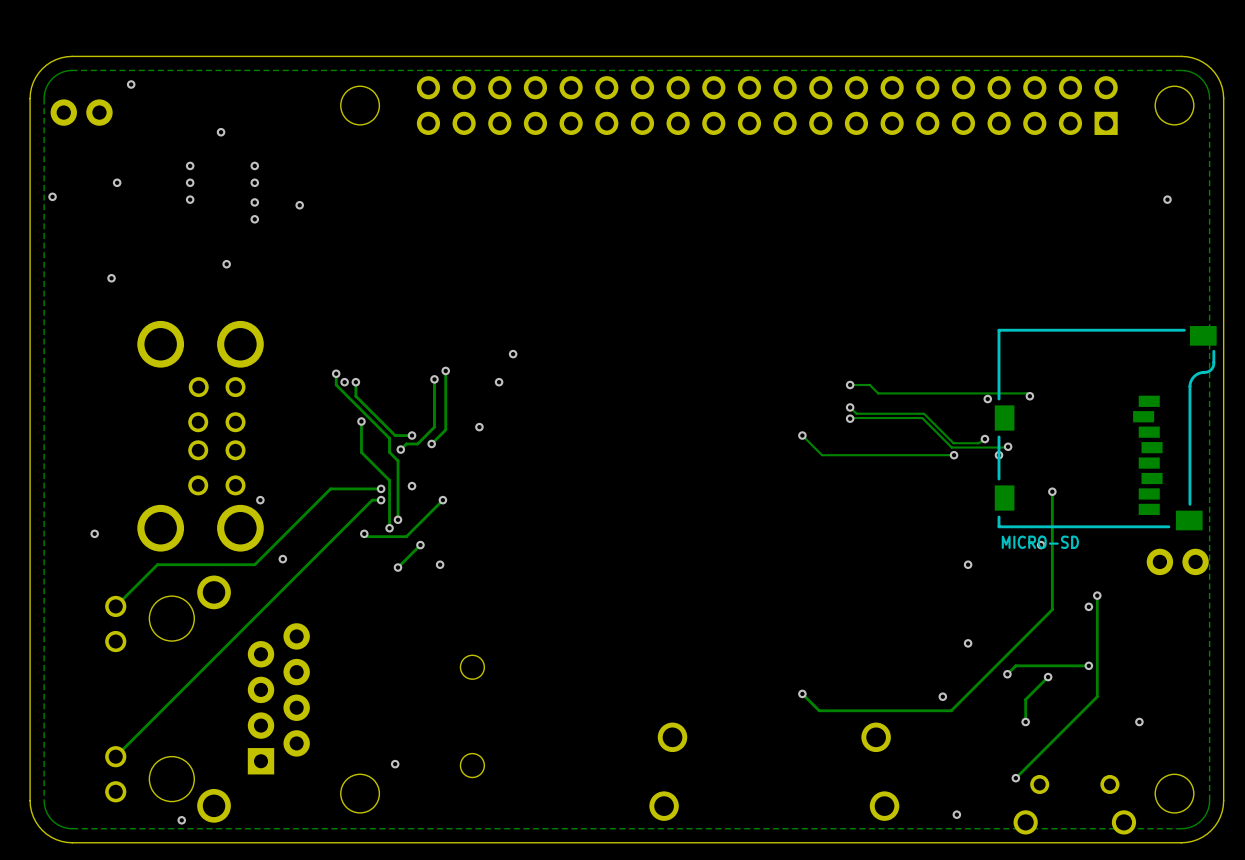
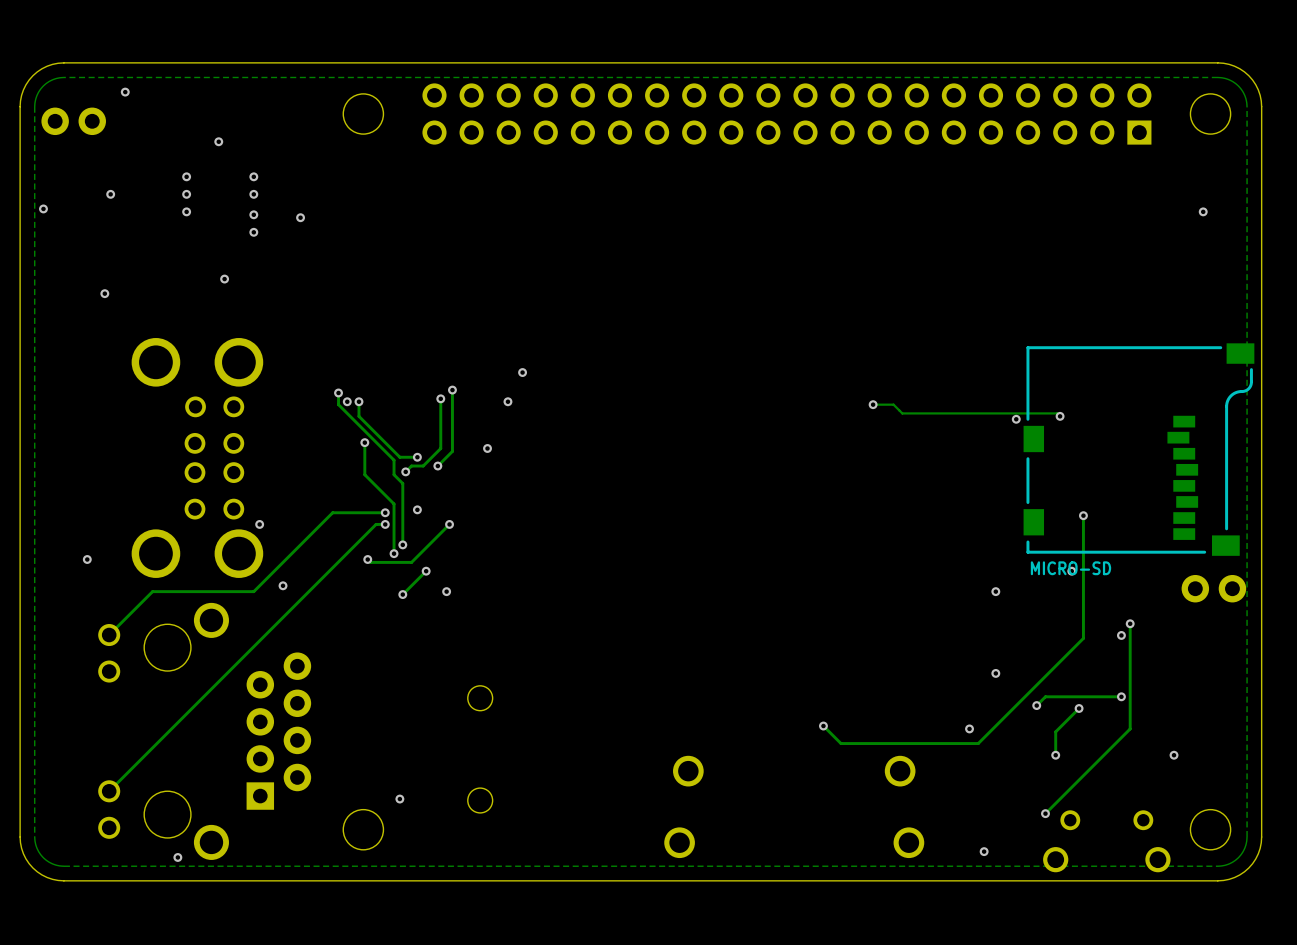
track: (850, 407) (856, 413) (924, 413) (953, 443) (978, 443) (984, 439) -> none
via: (850, 407) -> none
track: (850, 418) (922, 418) (951, 447) (1008, 446) -> none
via: (850, 418) -> none
track: (802, 435) (822, 455) (954, 455) -> none
via: (802, 435) -> none
via: (984, 439) -> none
via: (1008, 446) -> none
via: (954, 455) -> none
via: (998, 455) -> none

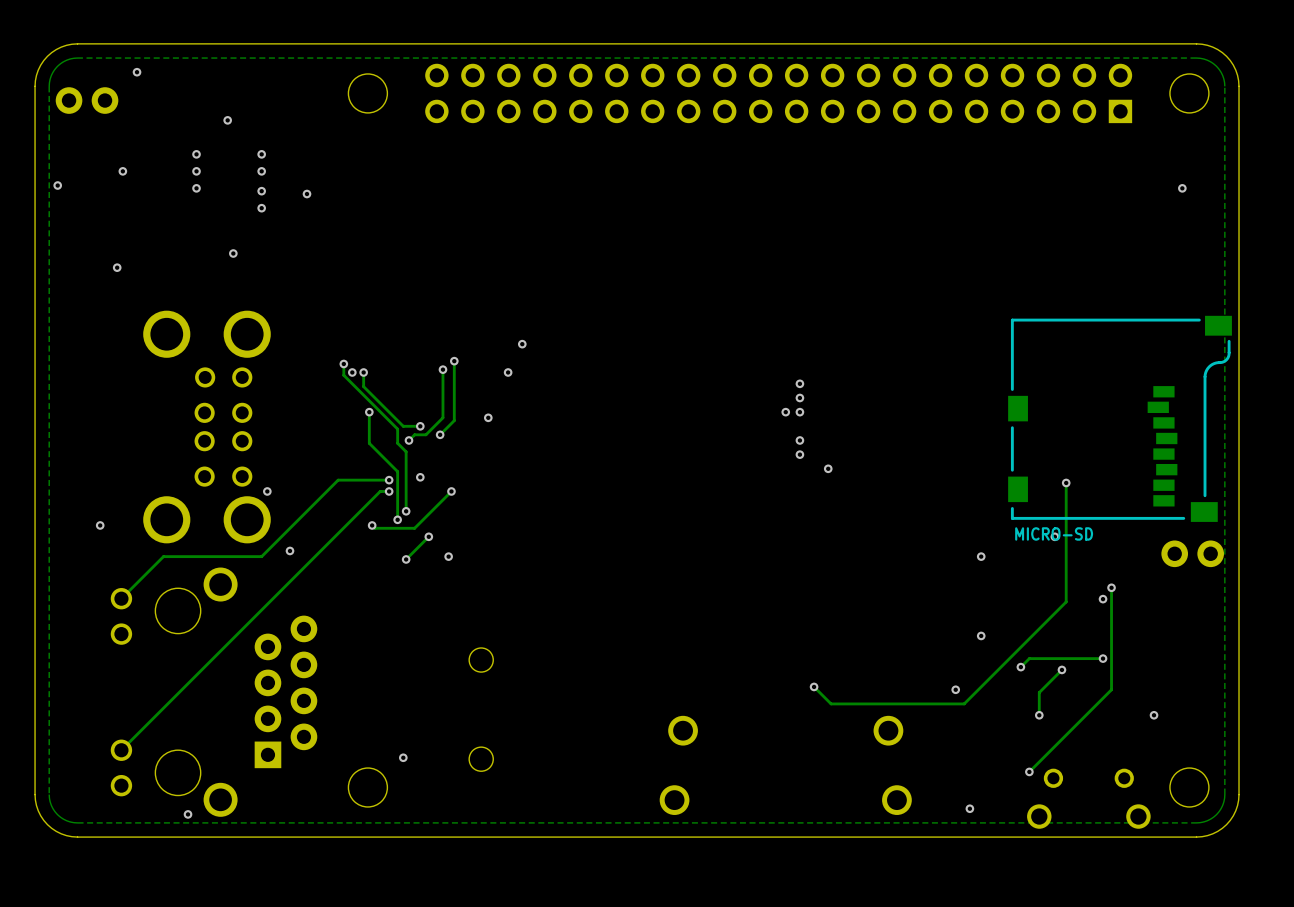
track: (873, 404) (893, 404) (902, 413) (1057, 413) (1060, 416) -> none
via: (873, 404) -> none
via: none -> (799, 383)
via: (1060, 416) -> none
via: (1016, 419) -> none
via: none -> (799, 397)
via: none -> (785, 412)
via: none -> (799, 412)
via: none -> (799, 440)
via: none -> (799, 454)
via: none -> (828, 468)

